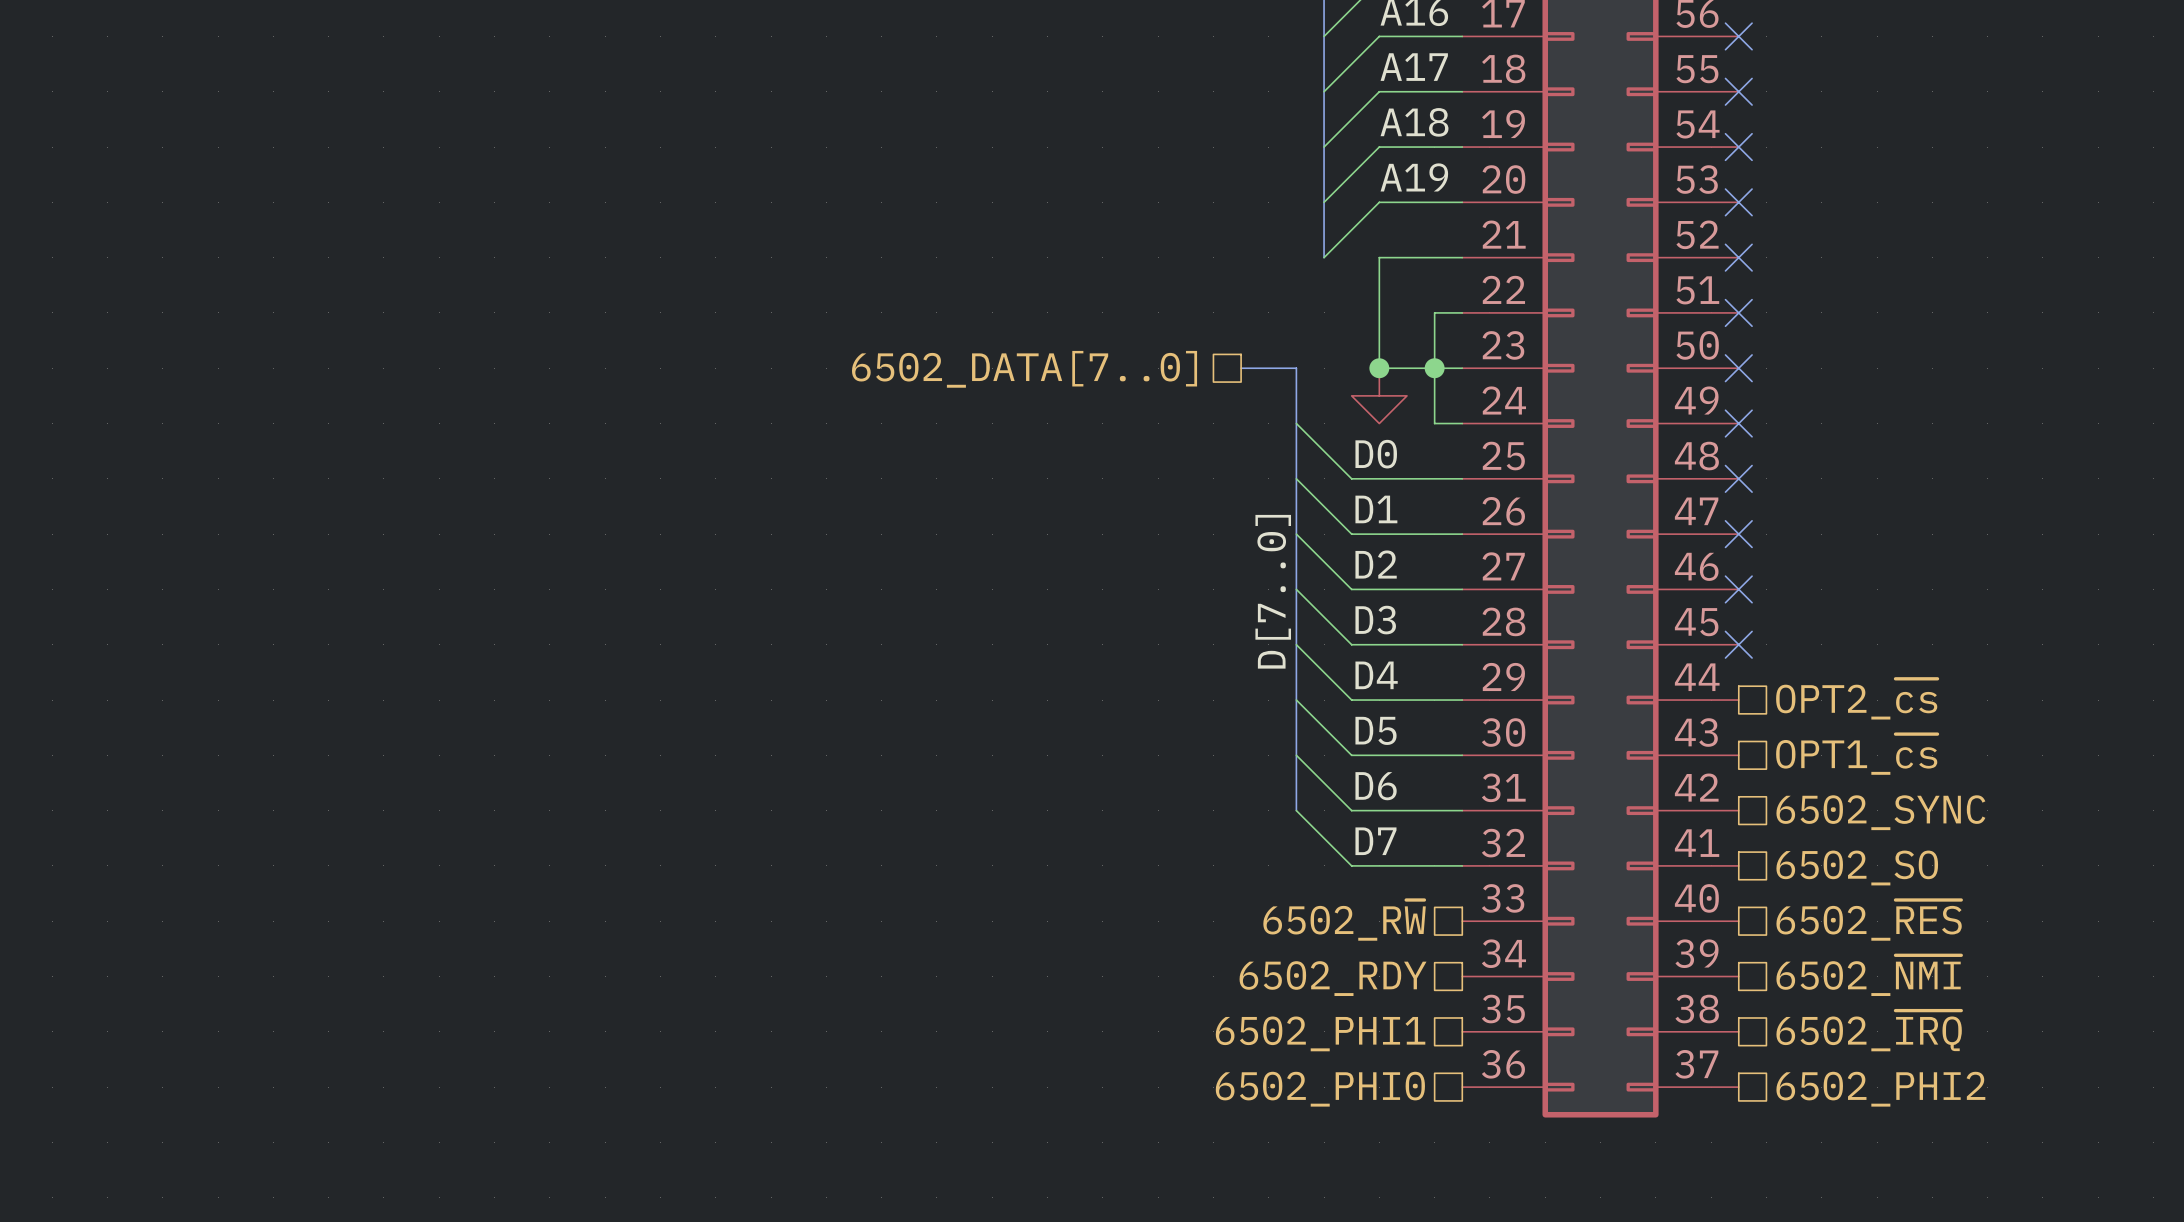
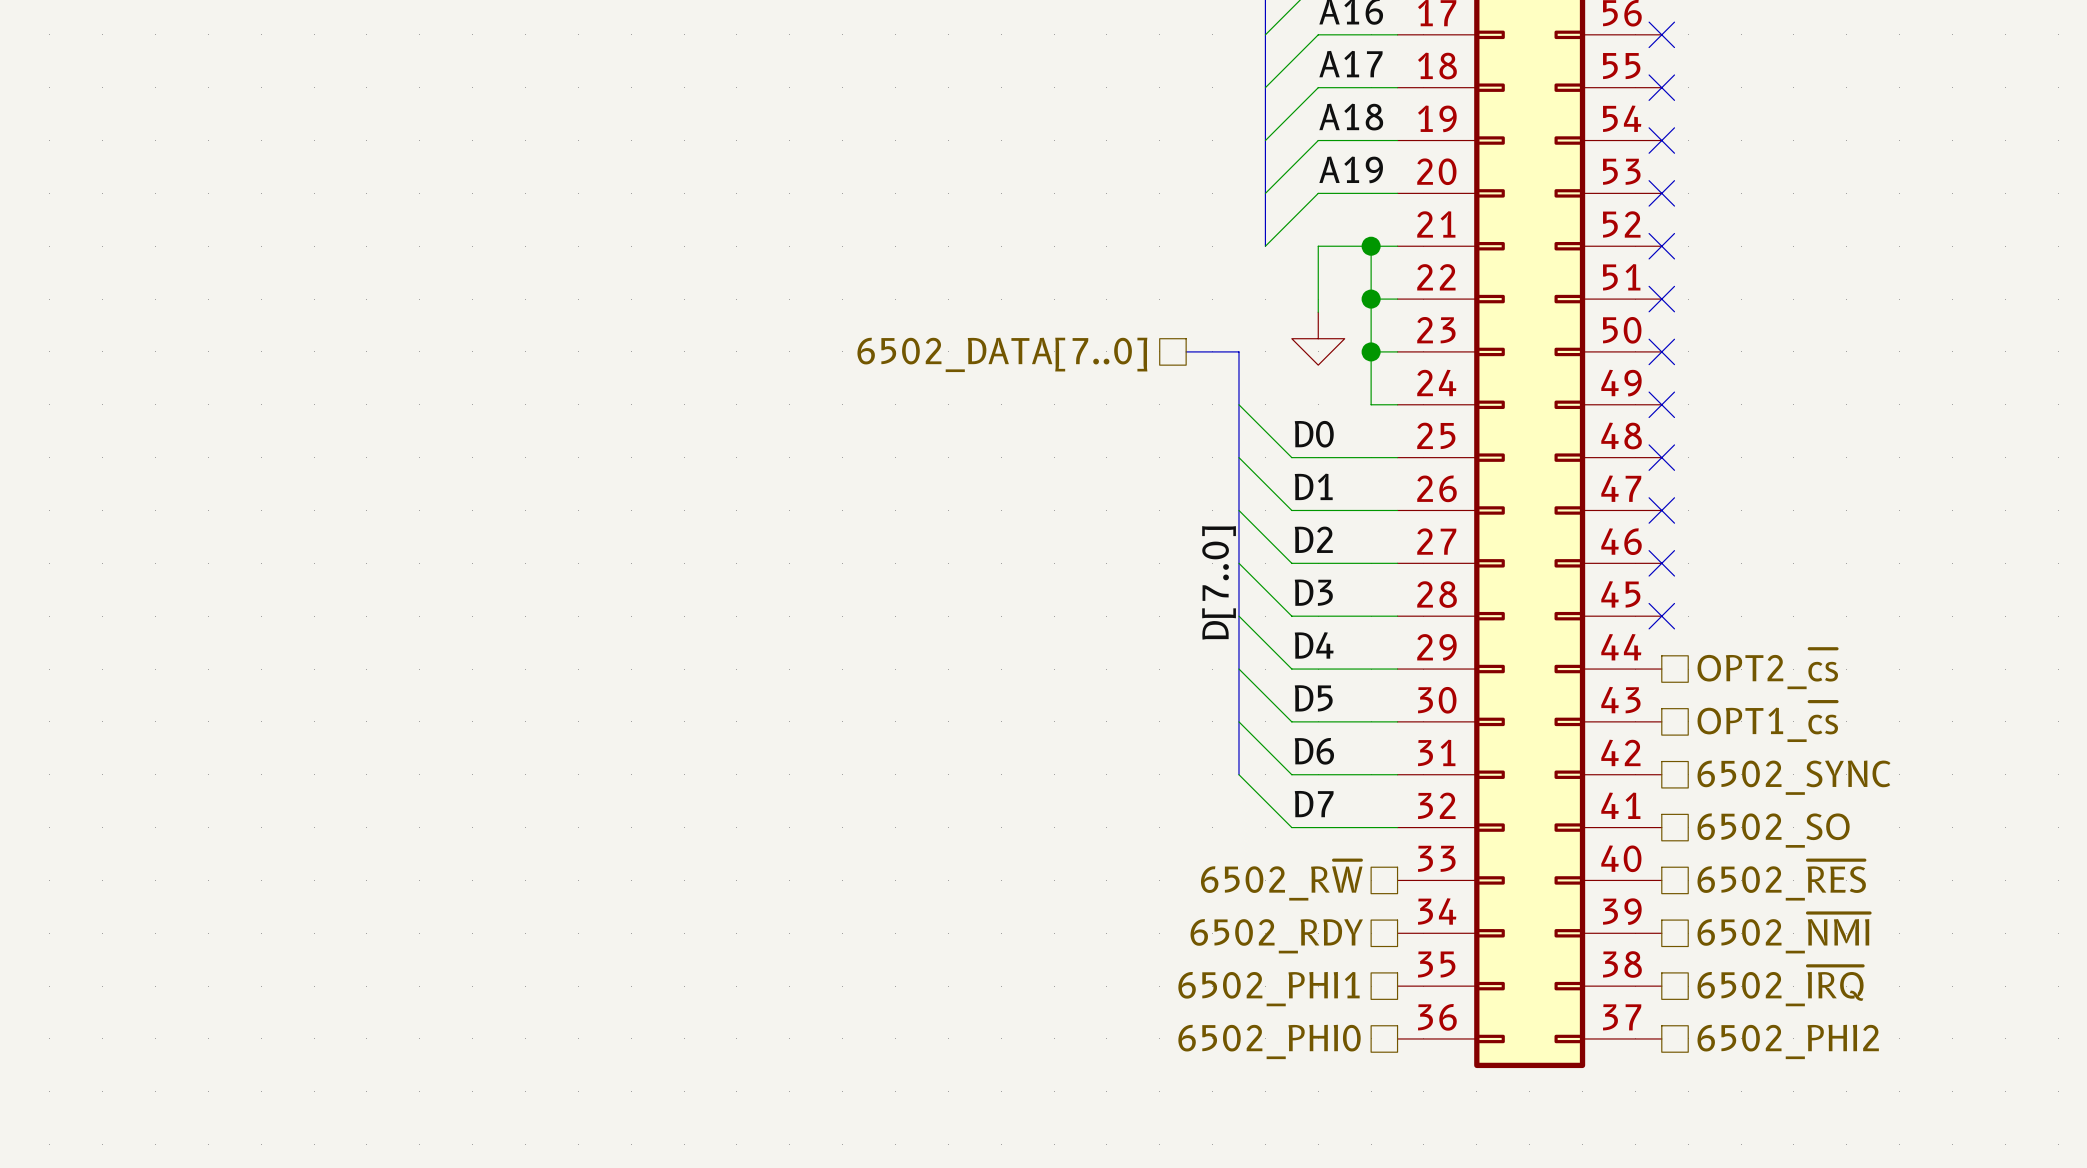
wire: none -> (1371, 246) (1371, 299)
junction: none -> (1371, 246)
junction: none -> (1371, 299)
wire: (1379, 326) (1379, 368) (1434, 368) -> none
junction: (1379, 368) -> none
power symbol position: (1379, 395) -> (1318, 338)

